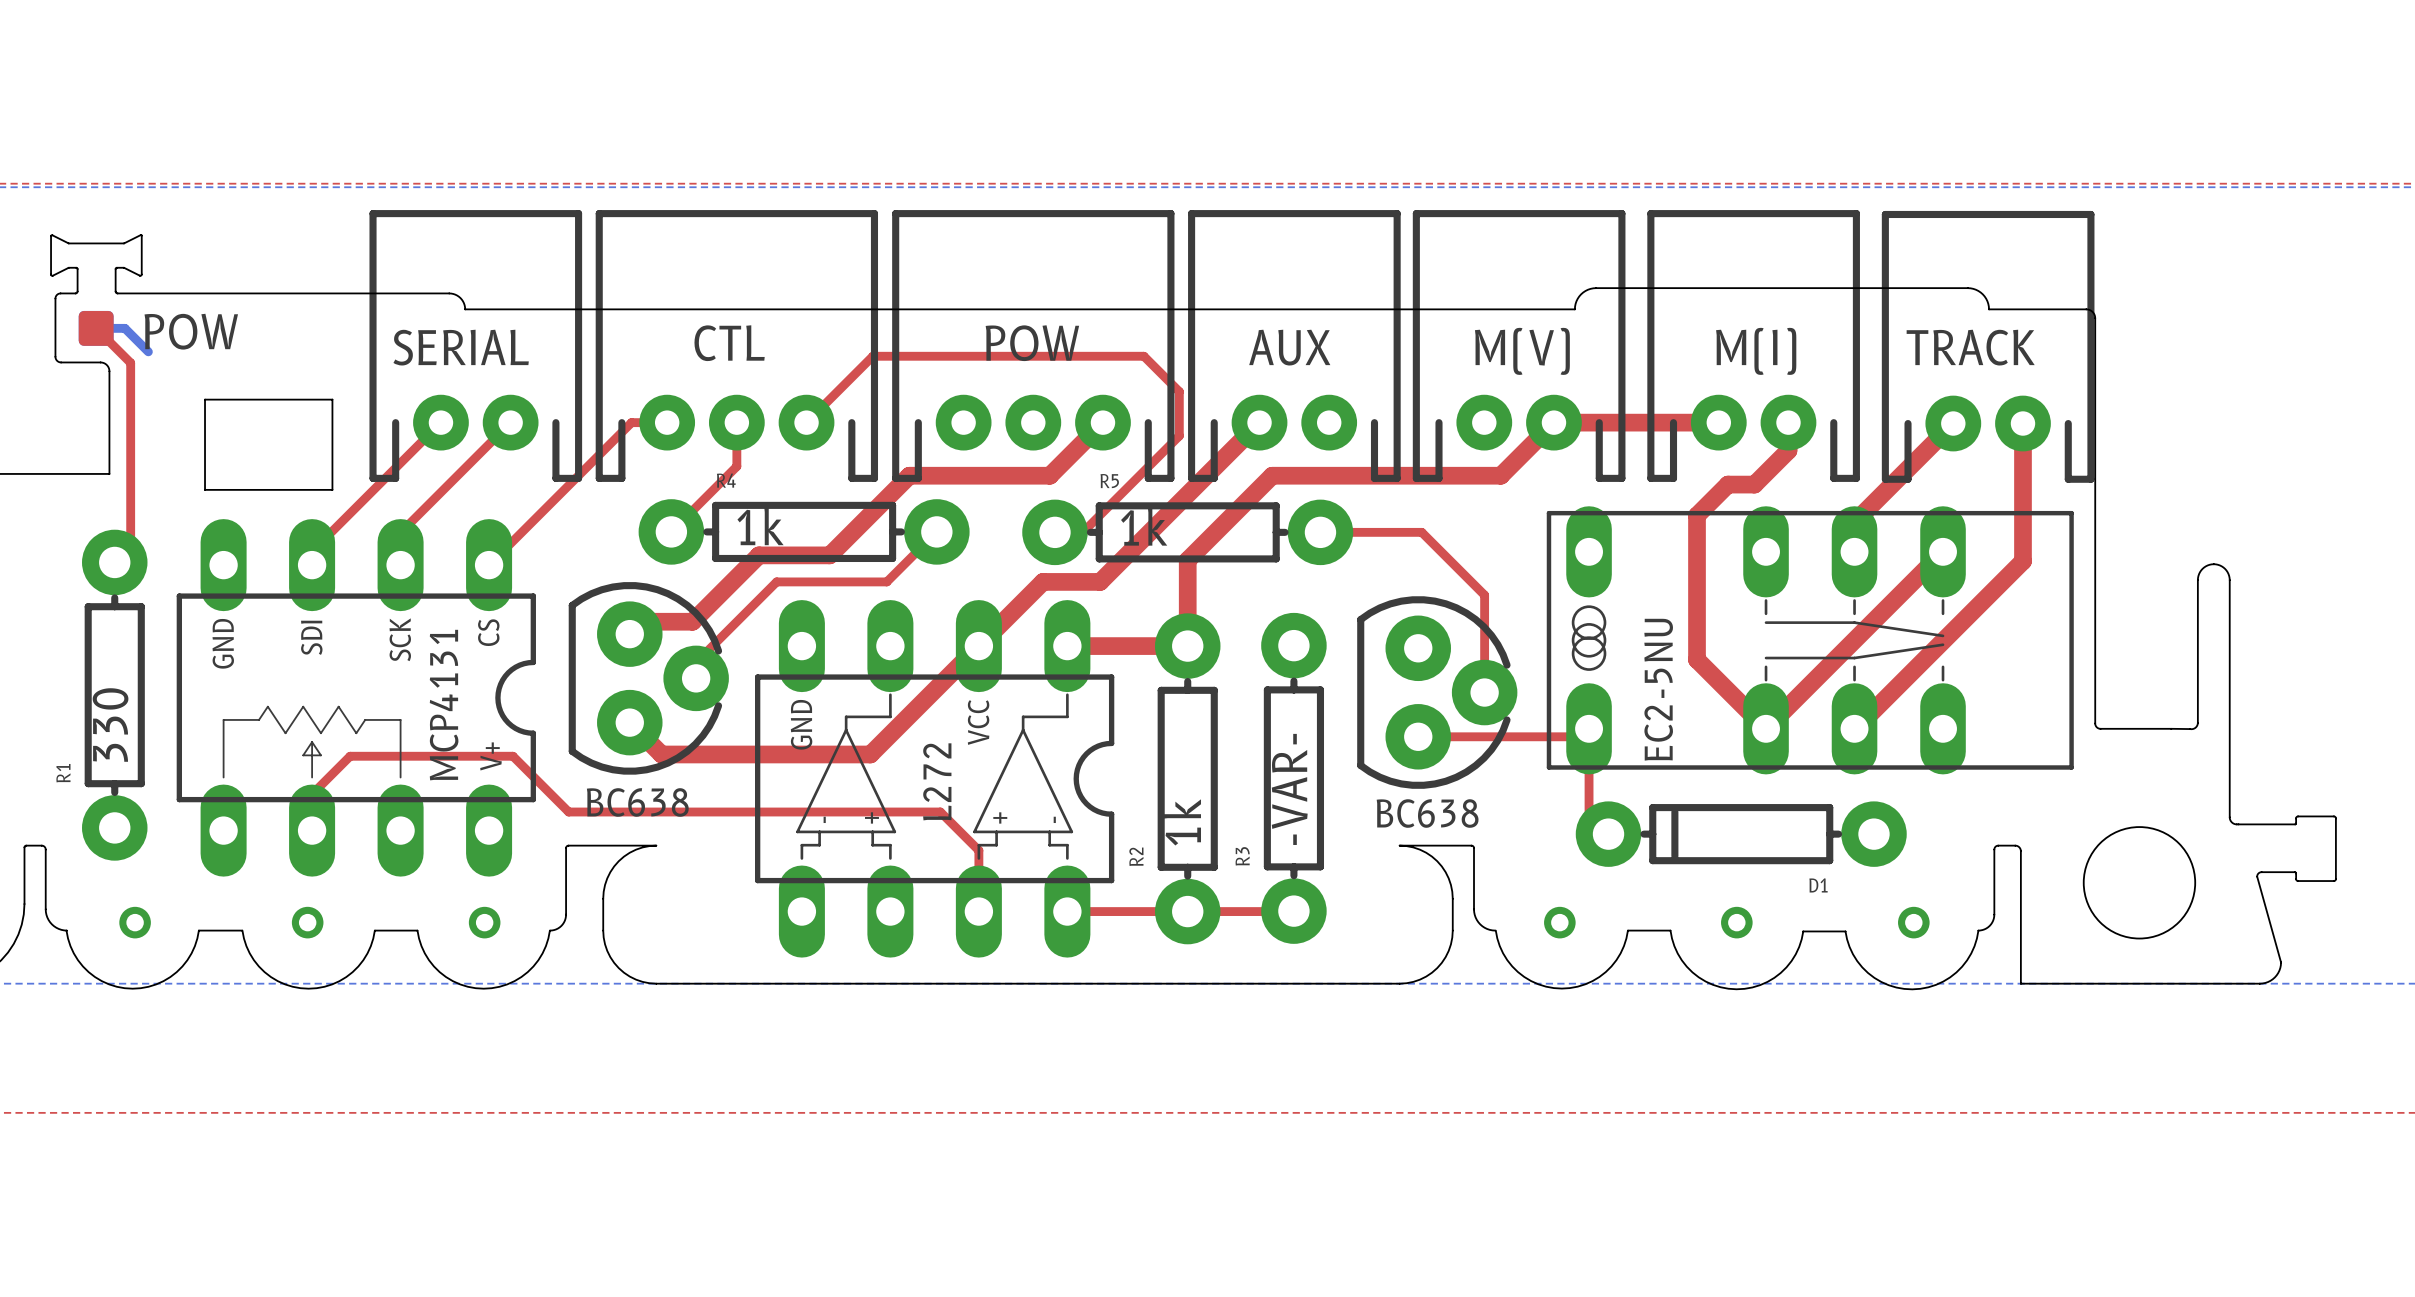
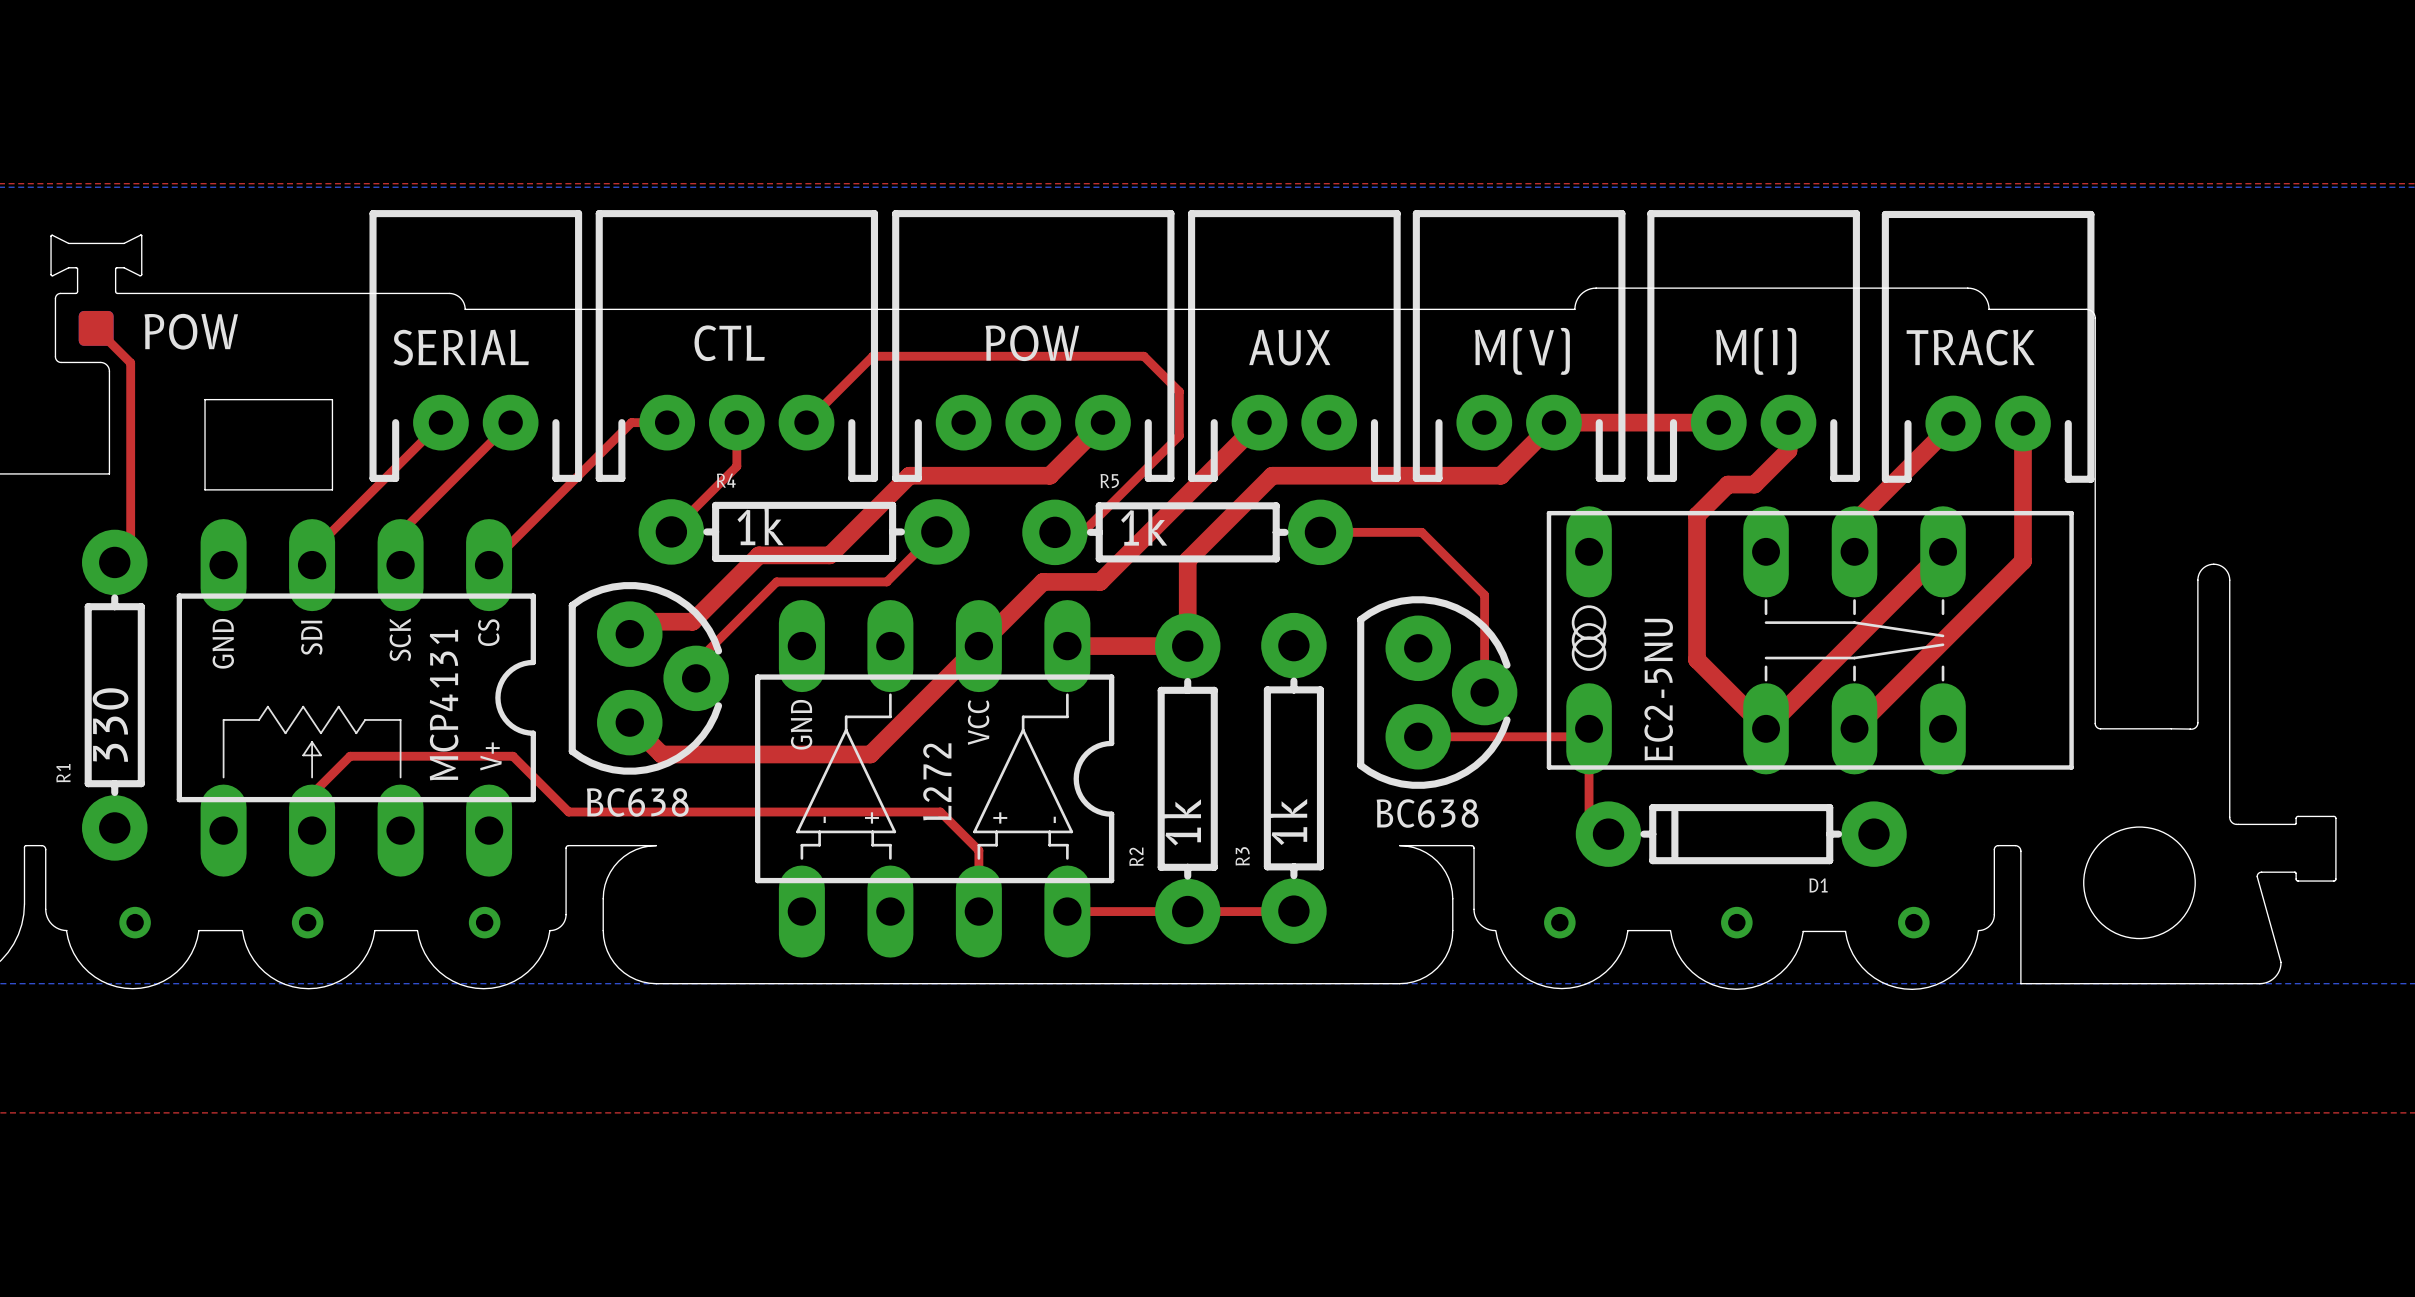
bottom track: (96, 328) (124, 328) (148, 351) -> none
R3 value: -VAR- (1289, 789) -> 1k (1288, 821)

